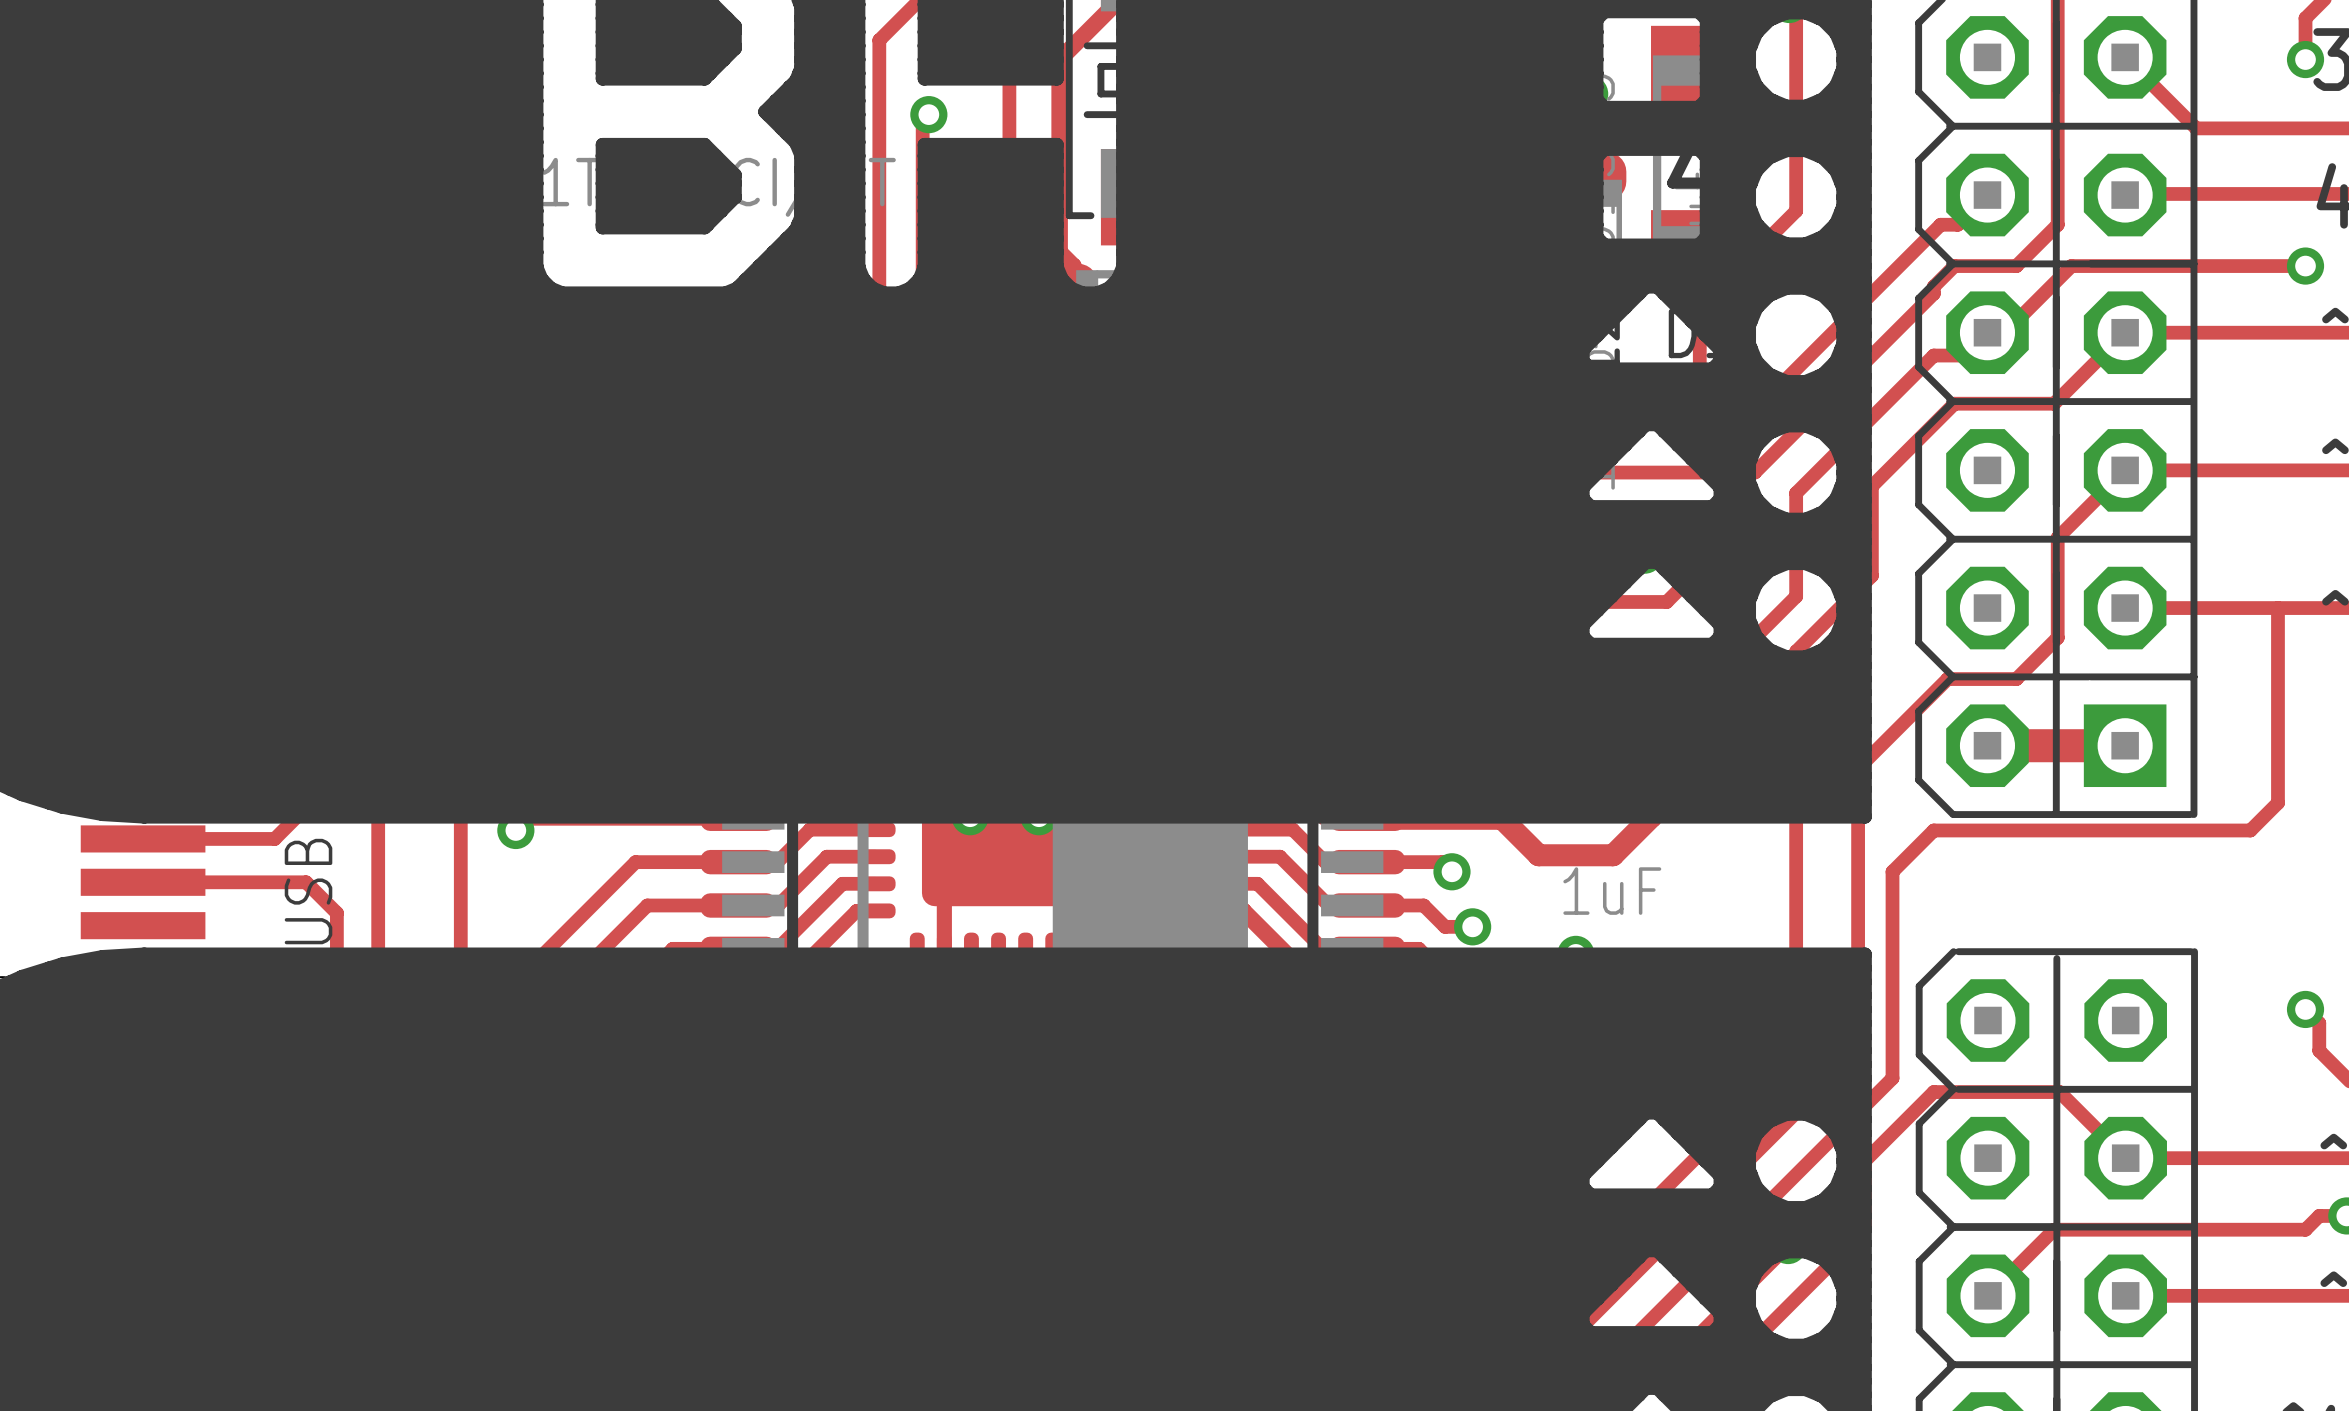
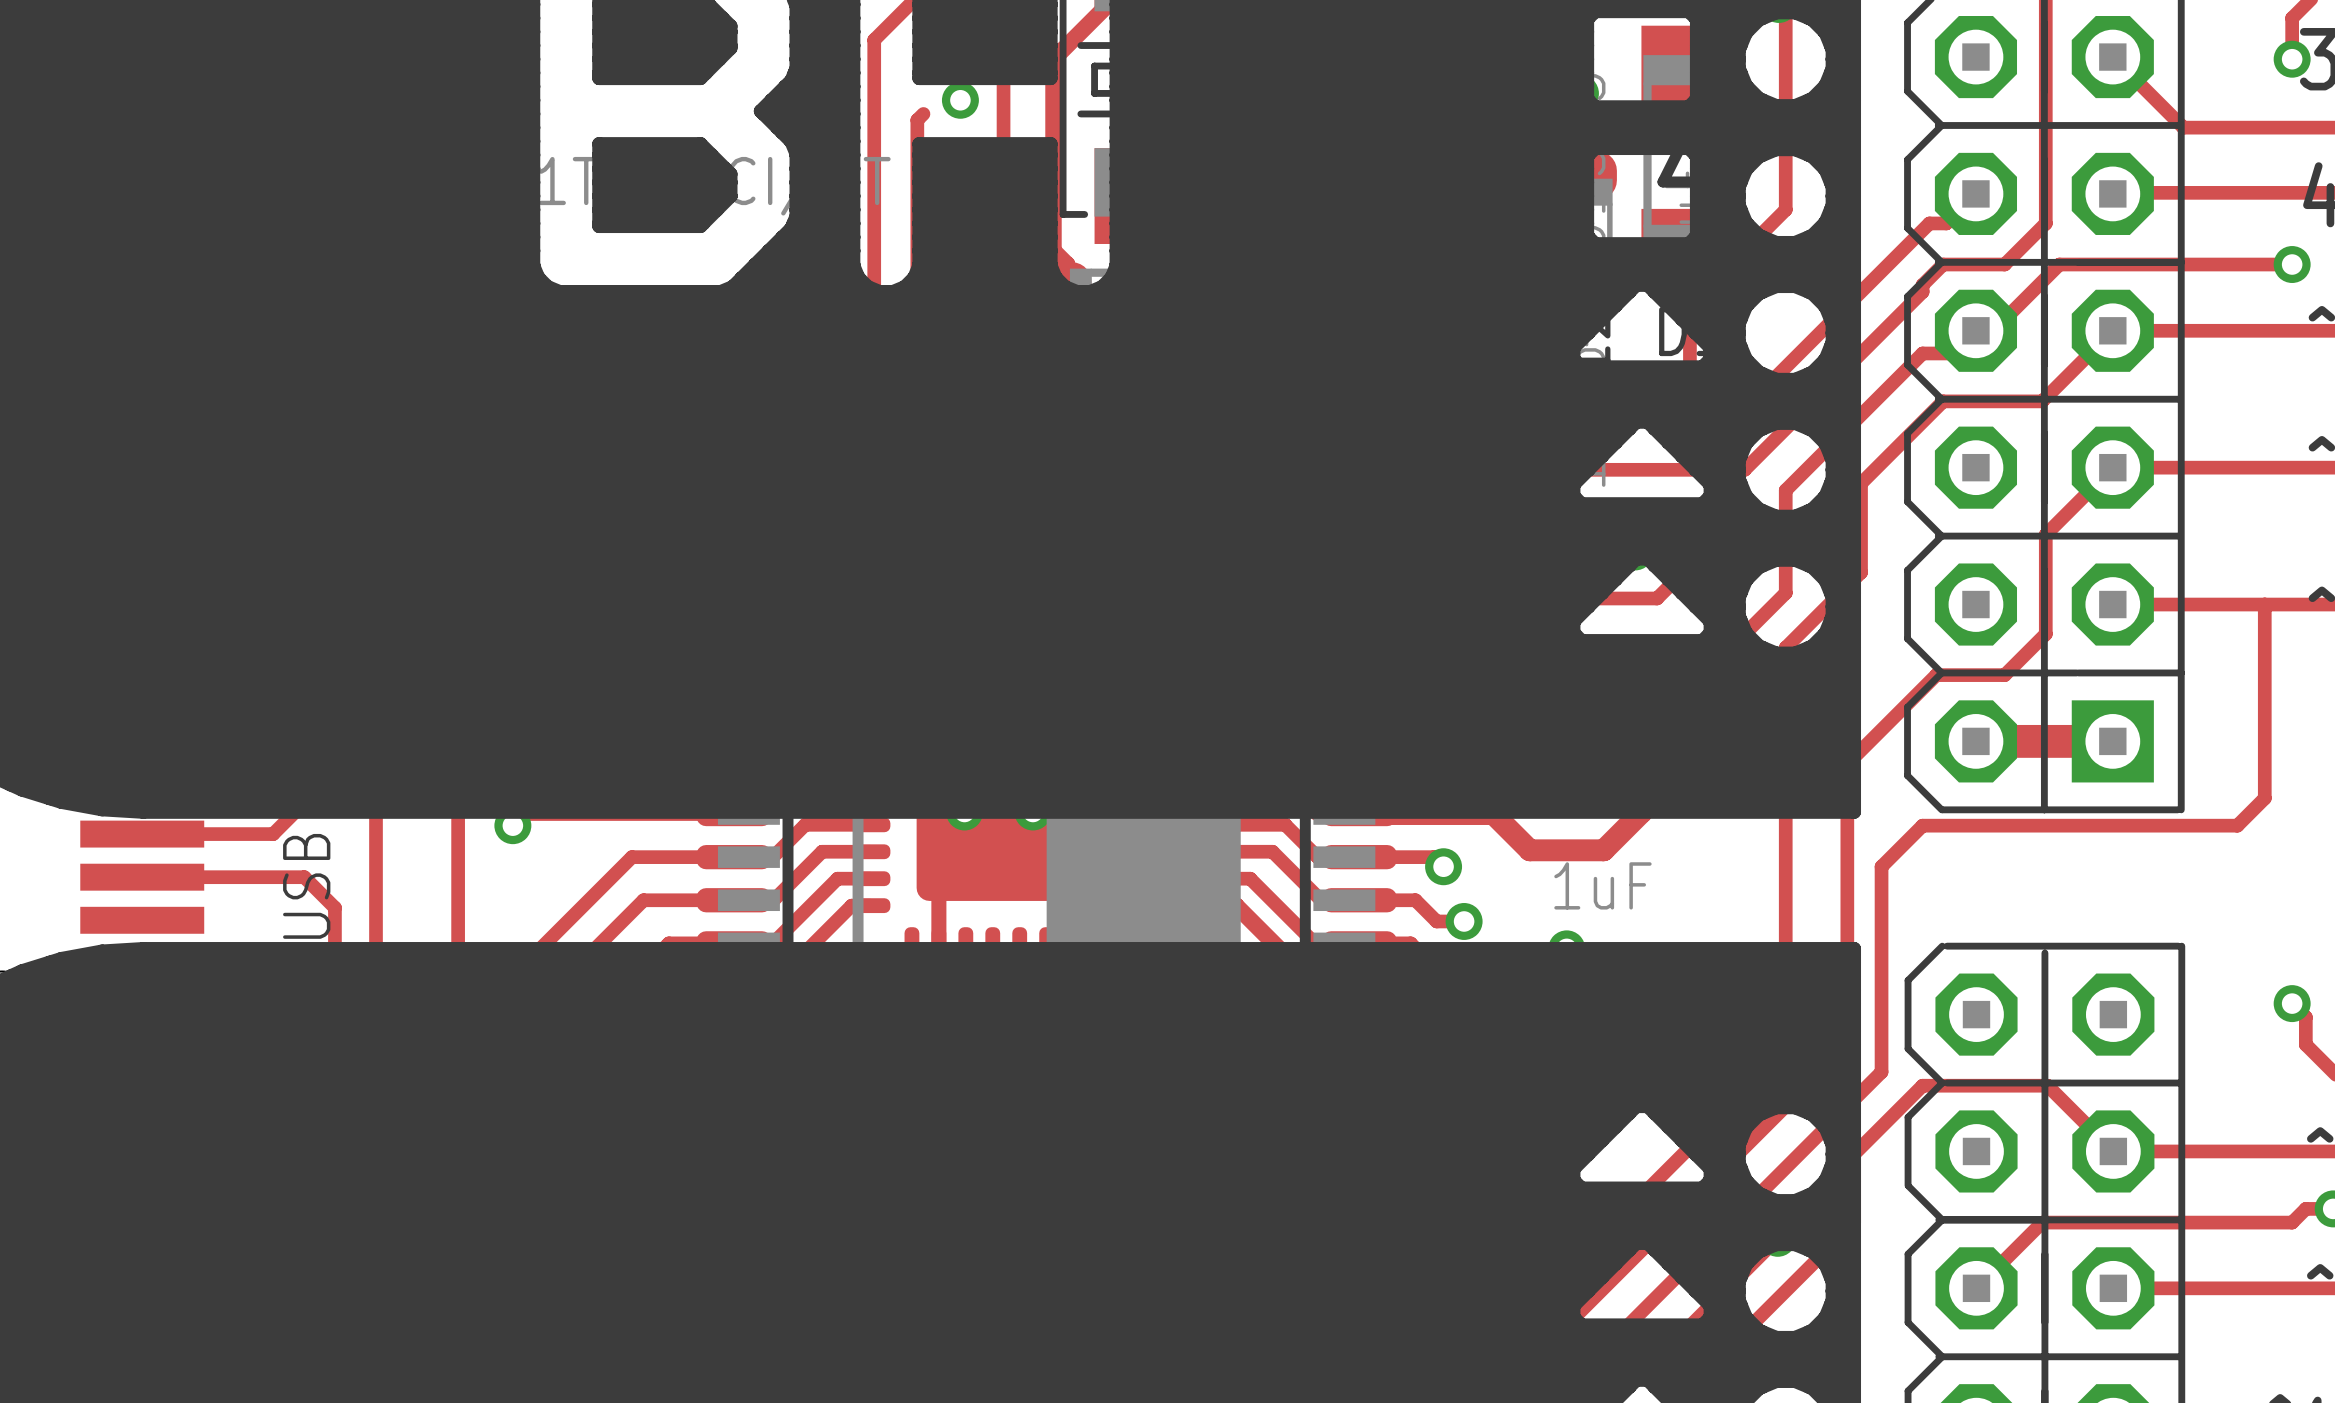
via position: (928, 114) -> (960, 100)

